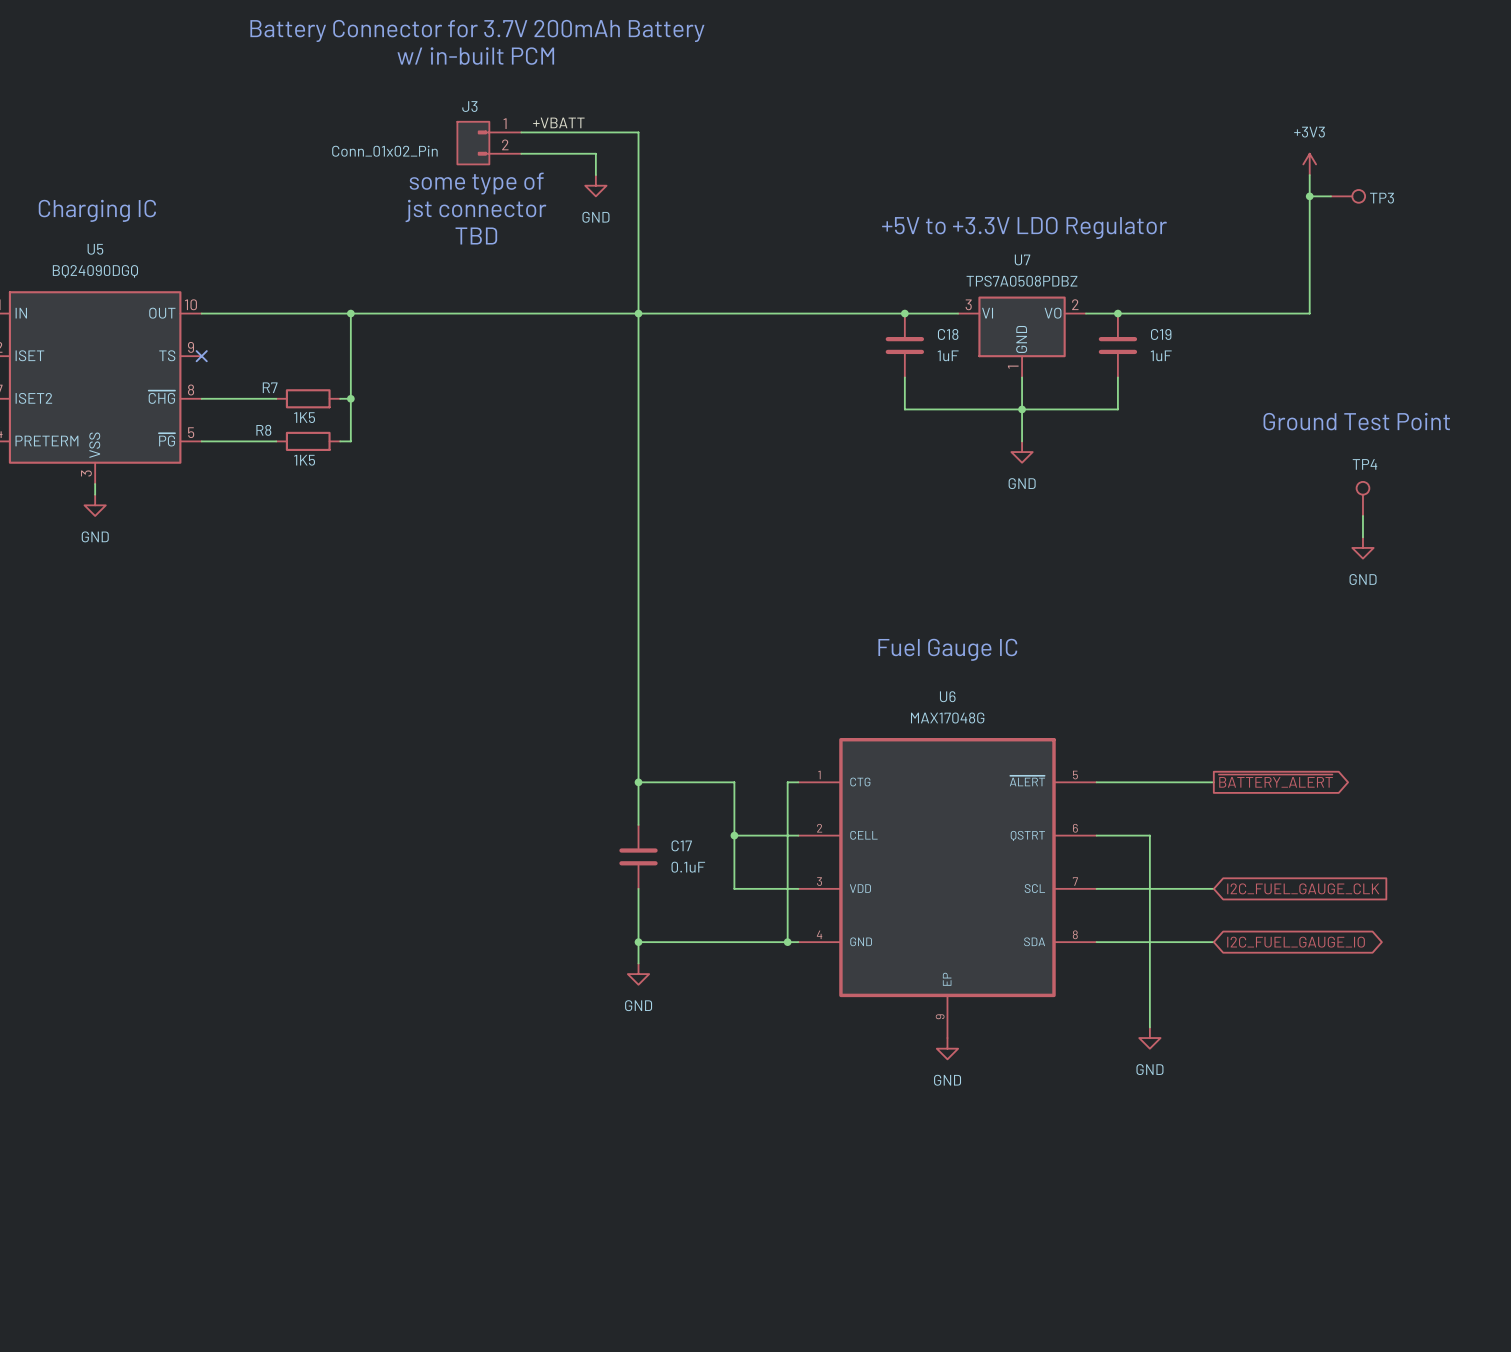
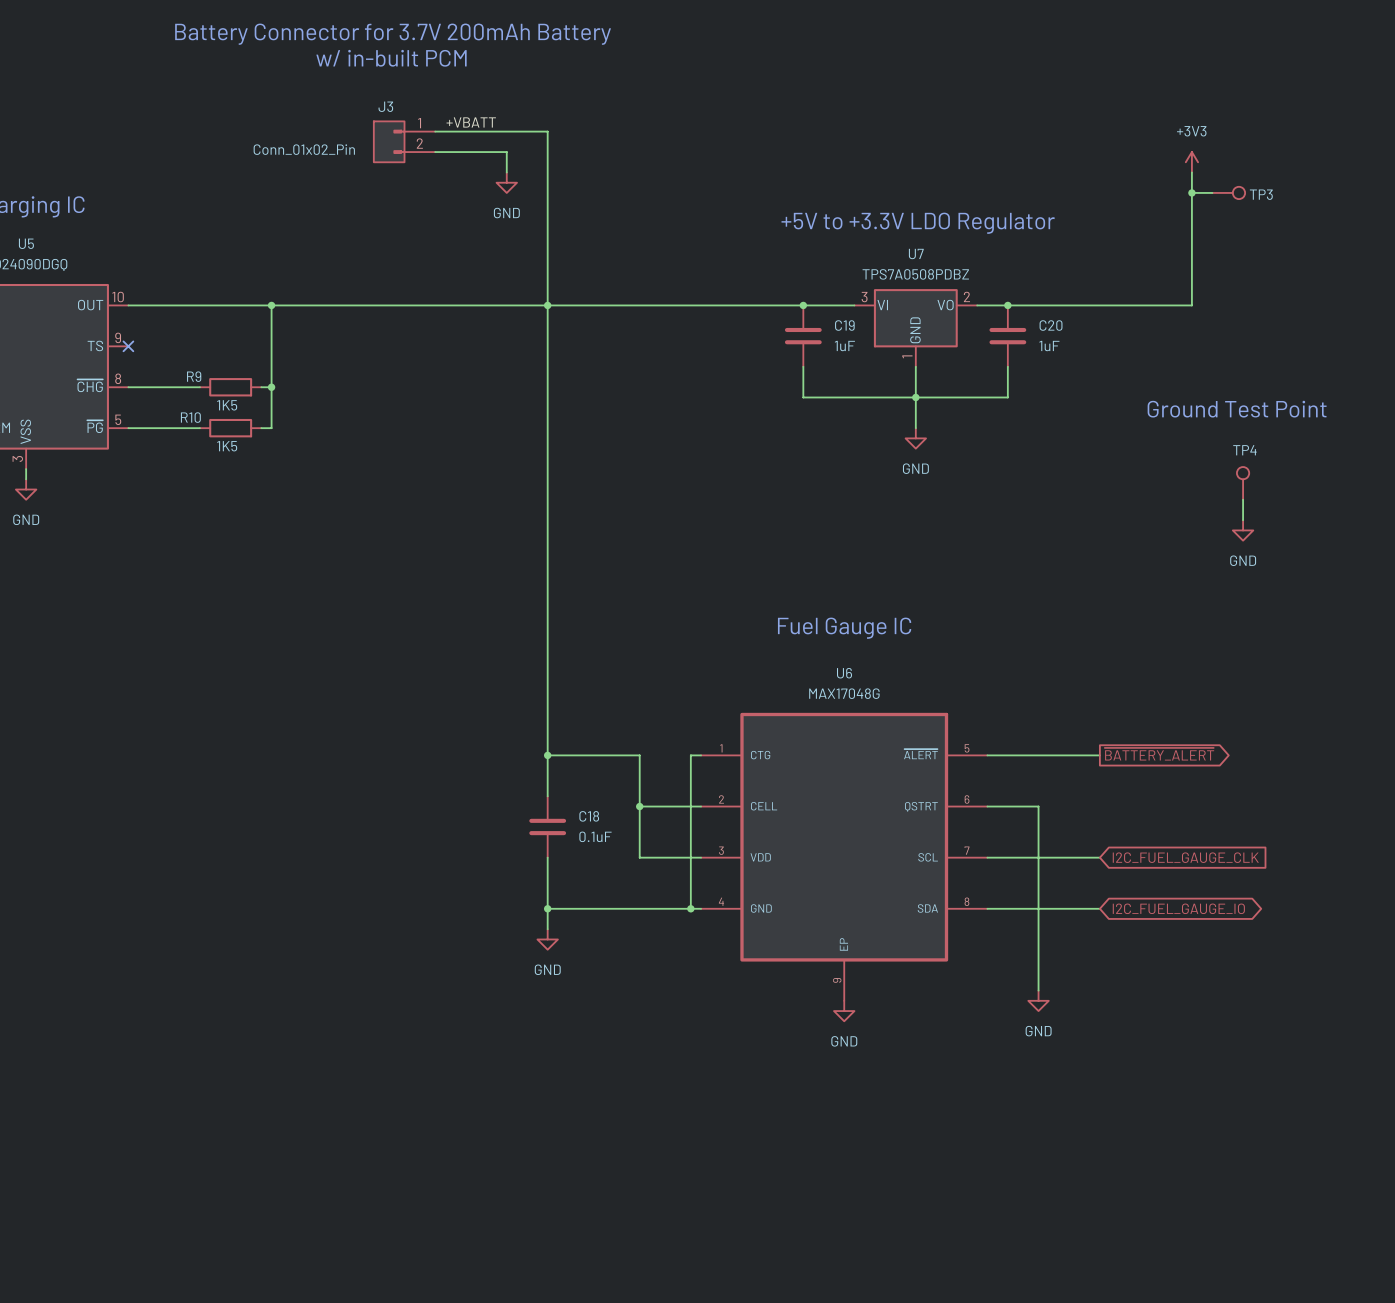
text: some type of (476, 183) -> none
text: jst connector (475, 210) -> none
text: TBD (476, 235) -> none
C18 name: C18 (948, 334) -> C19 (844, 325)
C19 name: C19 (1161, 334) -> C20 (1051, 325)
R7 name: R7 (270, 387) -> R9 (194, 376)
R8 name: R8 (263, 430) -> R10 (190, 417)
C17 name: C17 (681, 845) -> C18 (589, 816)

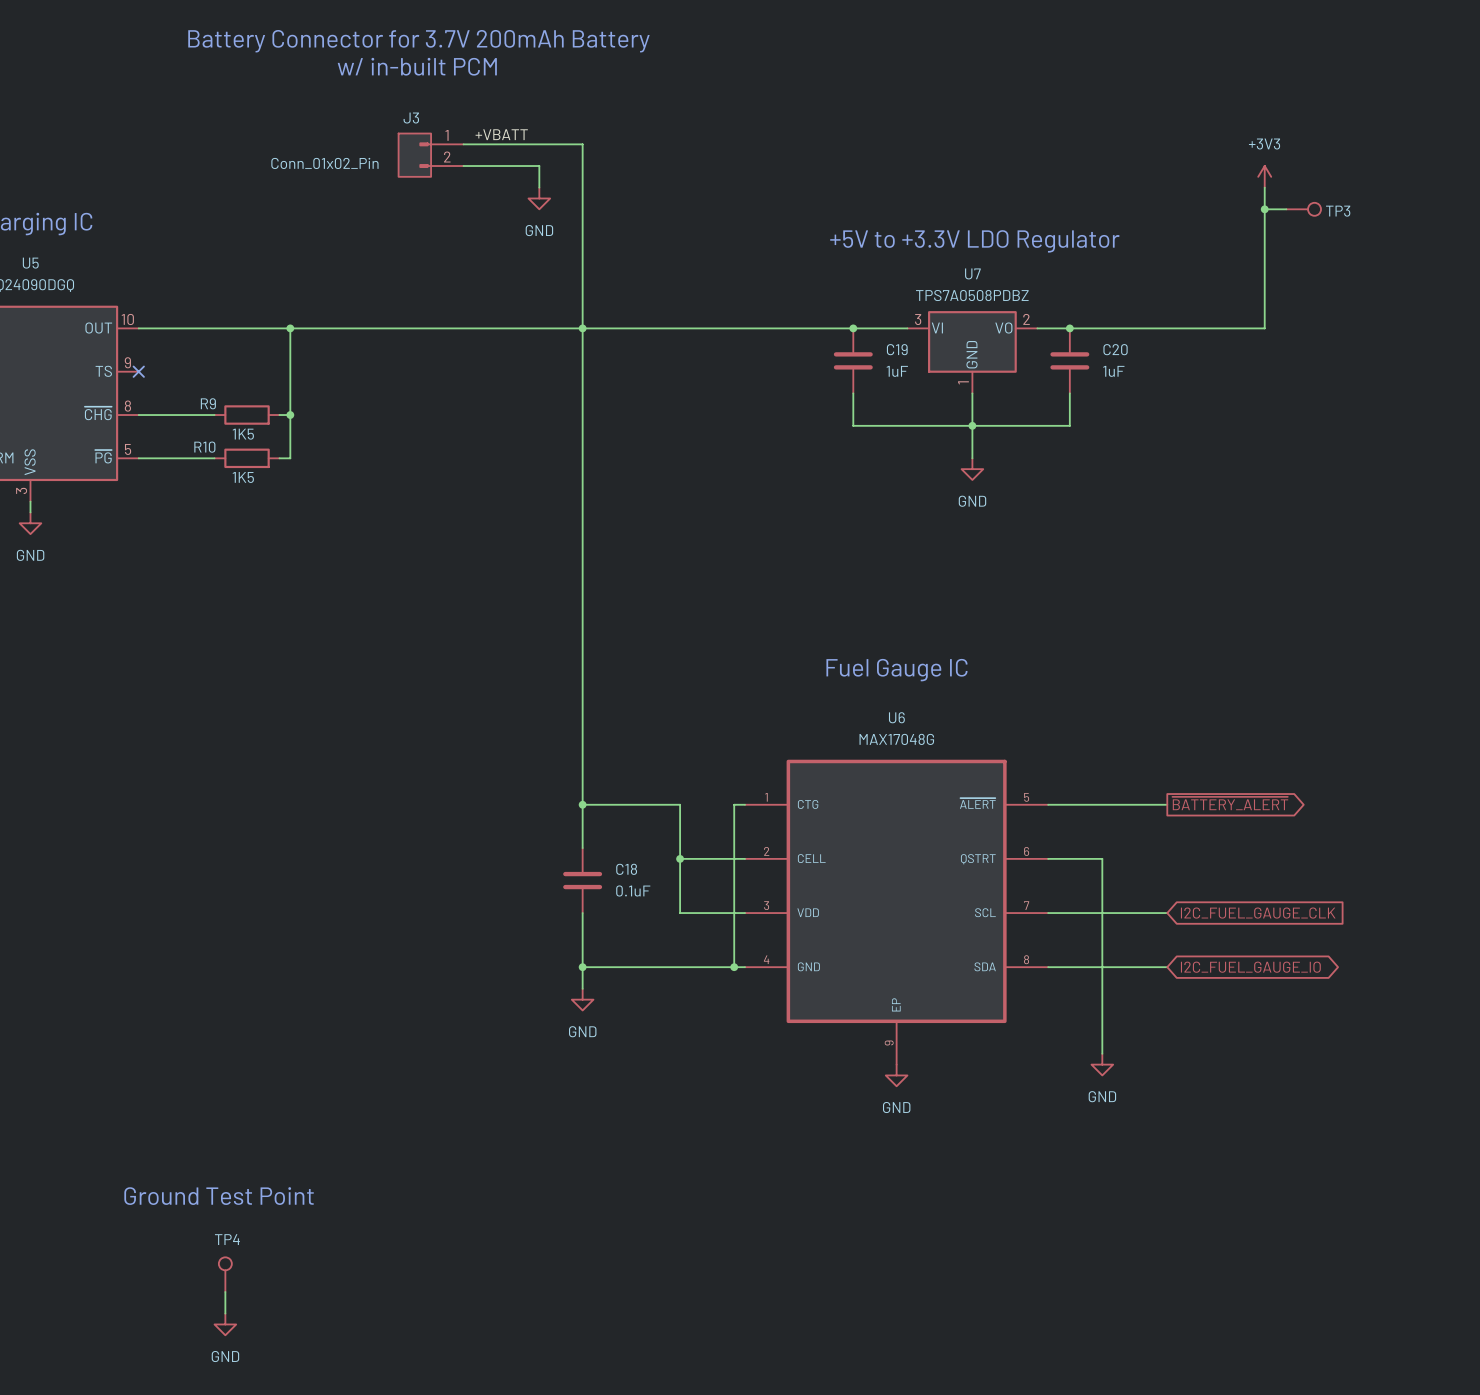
text: Ground Test Point (1237, 409) -> none
TP4 position: (1243, 483) -> (225, 1274)
wire: (1243, 499) (1243, 520) -> none
power symbol: GND (1243, 530) -> none
text: none -> Ground Test Point (219, 1196)
wire: none -> (225, 1291) (225, 1313)
power symbol: none -> GND (225, 1324)

